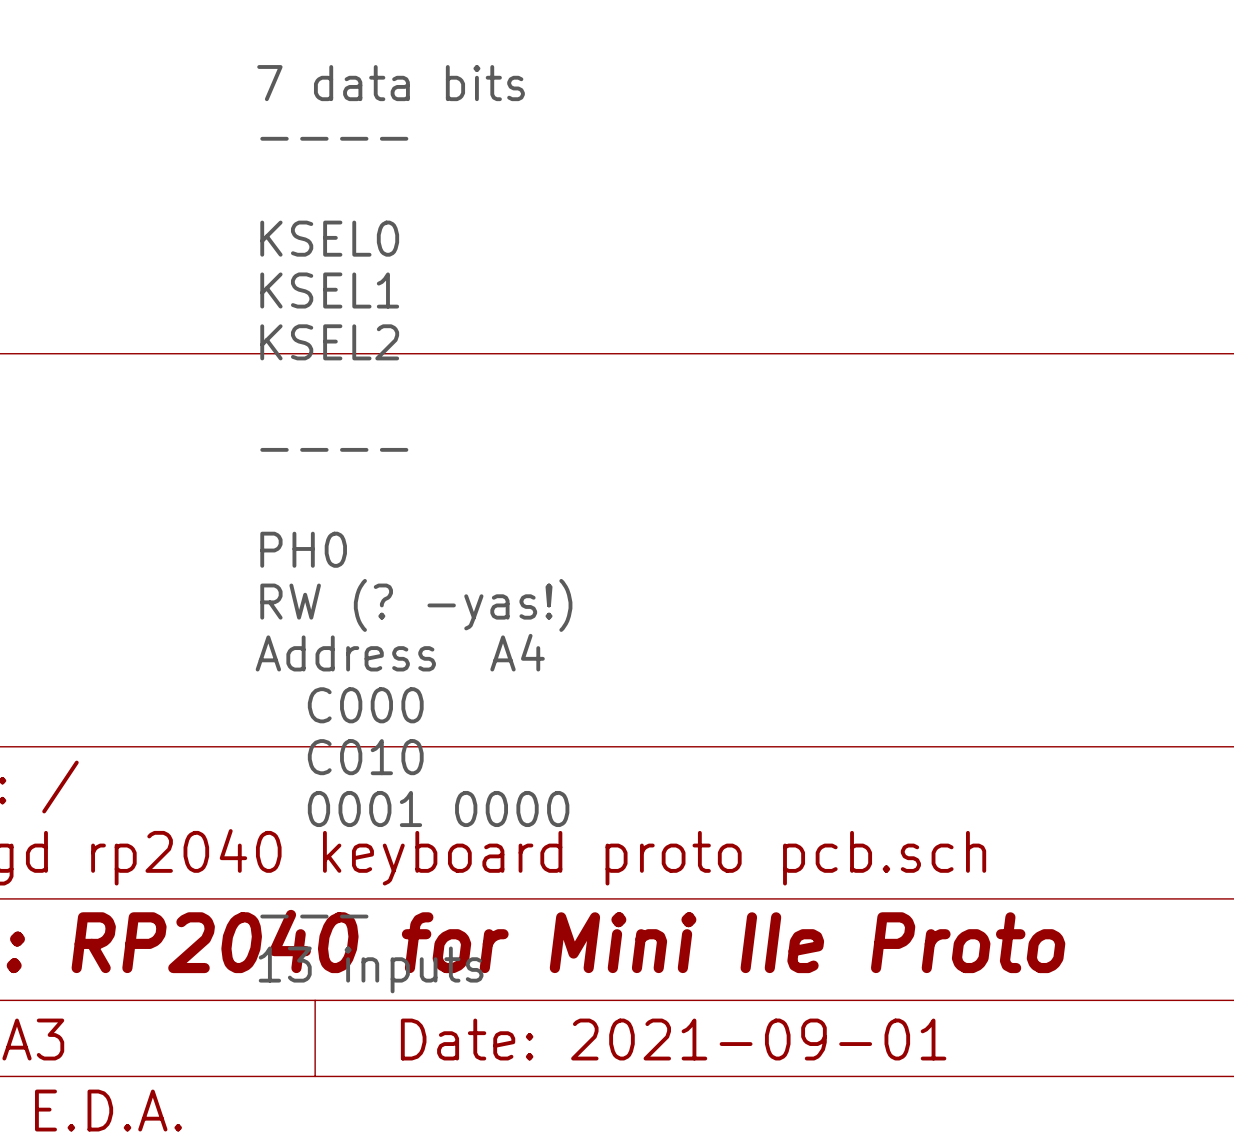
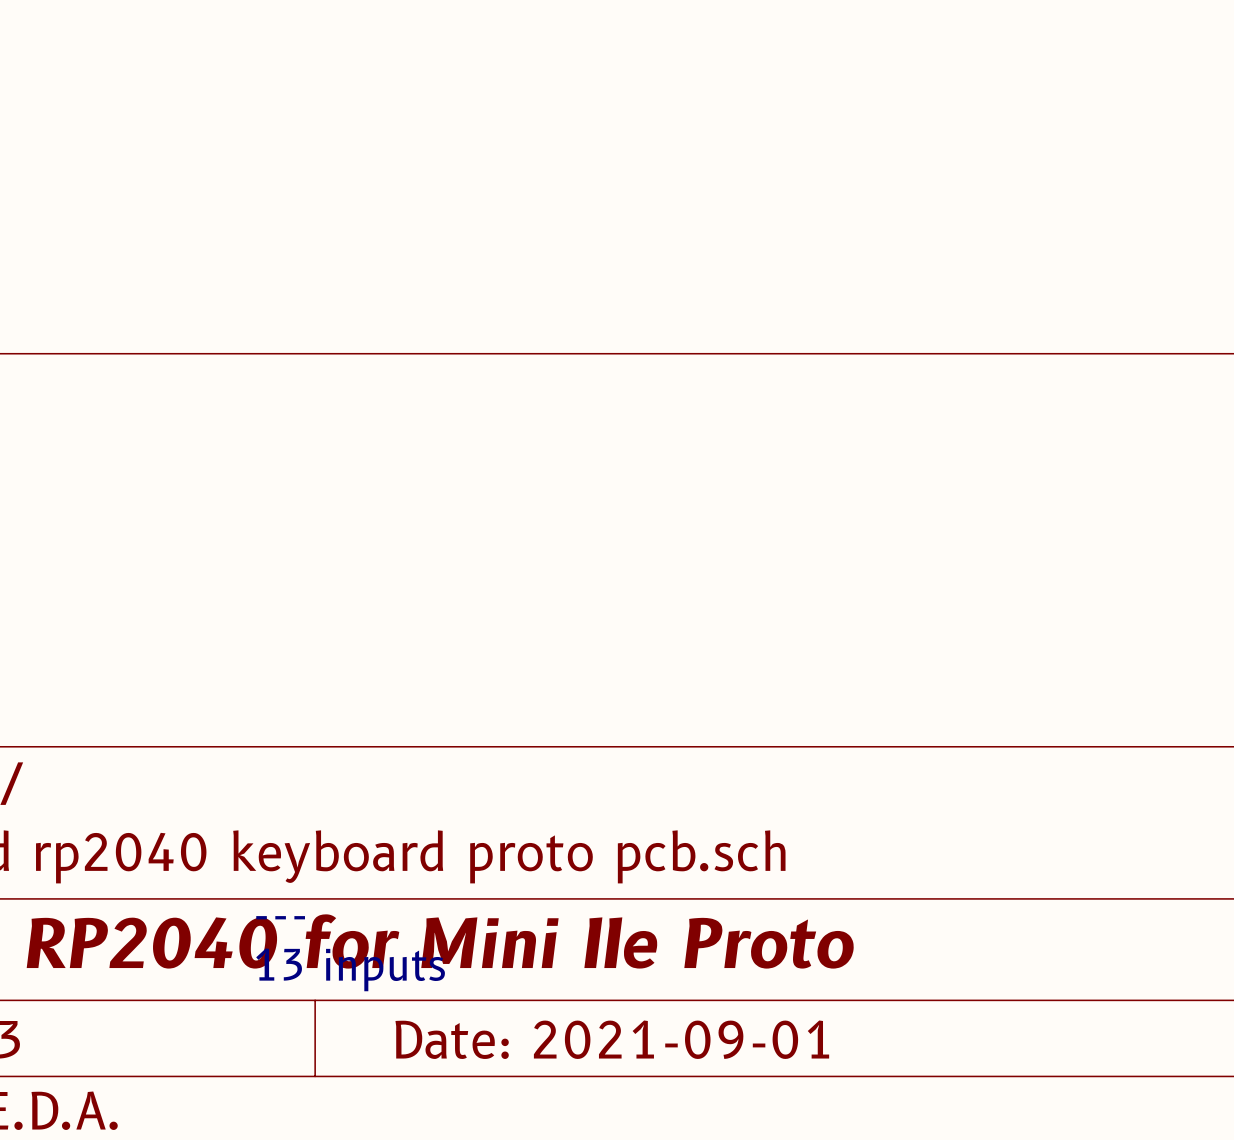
text: 7 data bits (391, 83) -> none
text: ---- (334, 138) -> none
text: KSEL0 (329, 238) -> none
text: KSEL1 (329, 290) -> none
text: KSEL2 (329, 342) -> none
text: ---- (334, 449) -> none
text: PH0 (303, 549) -> none
text: RW (? -yas!) (416, 605) -> none
text: Address A4 (400, 652) -> none
text: C000 (365, 705) -> none
text: C010 (365, 757) -> none
text: 0001 0000 (438, 808) -> none

